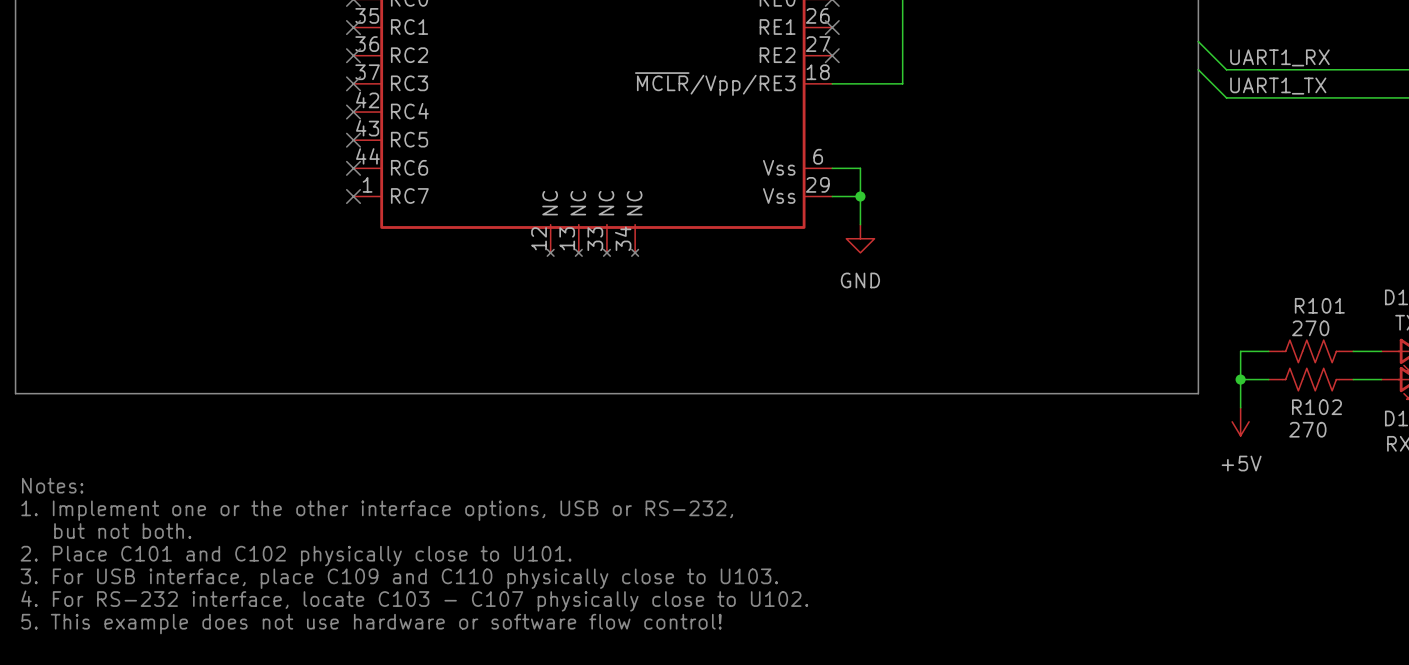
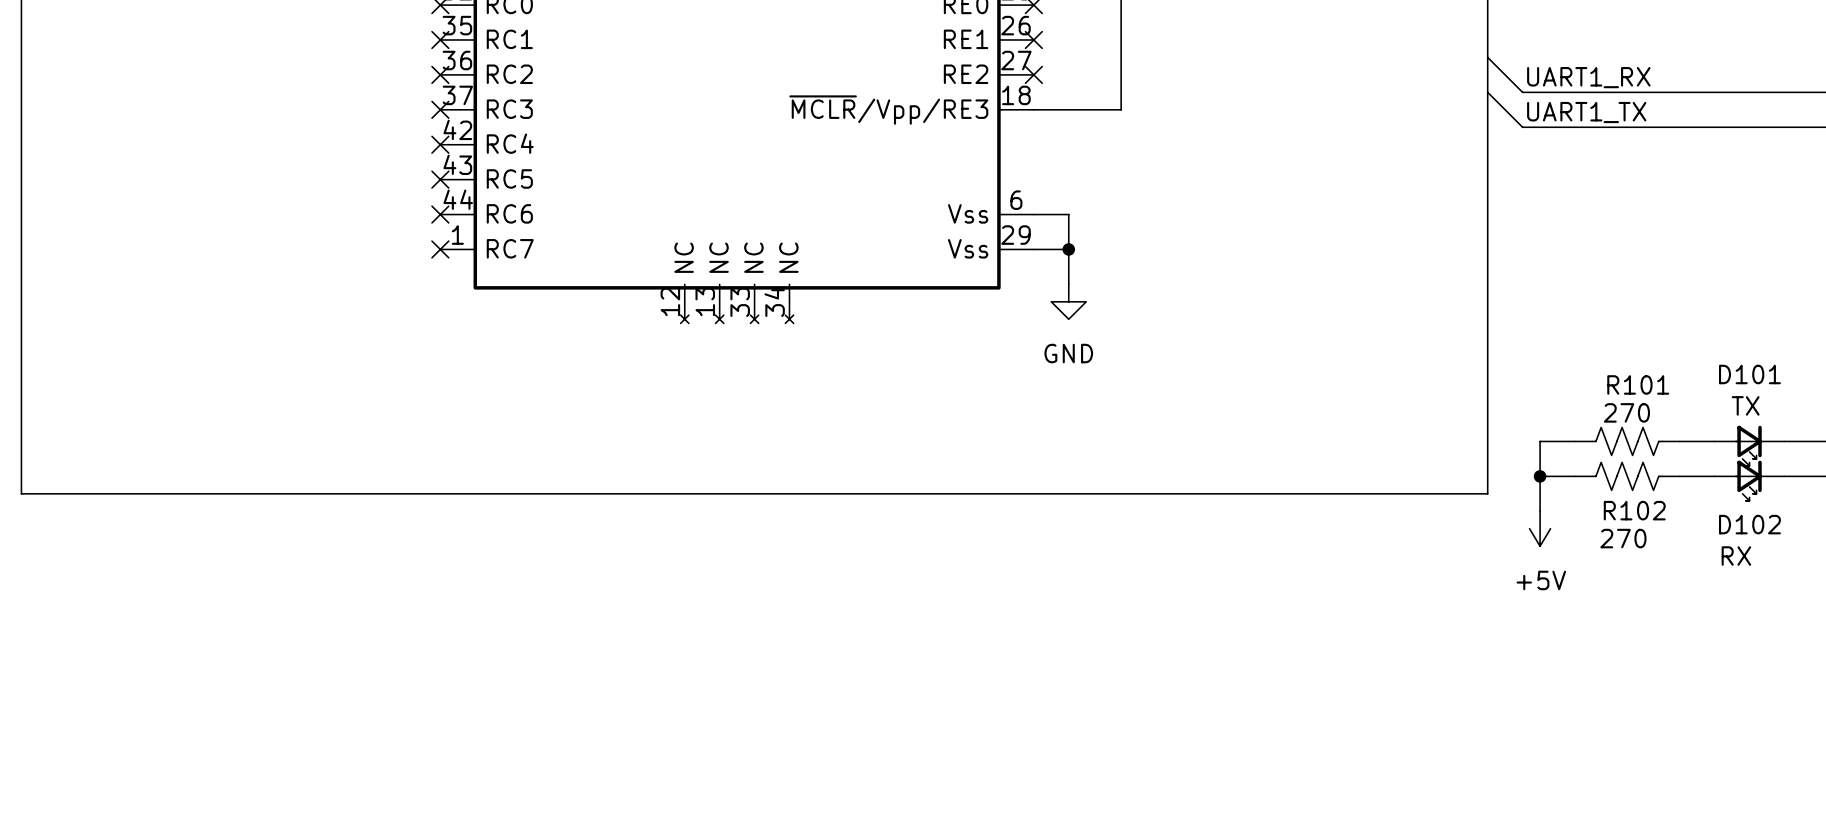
text: Notes: (52, 485) -> none
text: 1. Implement one or the other interface options, USB or RS-232, (377, 510) -> none
text: but not both. (122, 531) -> none
text: 2. Place C101 and C102 physically close to U101. (296, 556) -> none
text: 3. For USB interface, place C109 and C110 physically close to U103. (399, 578) -> none
text: 4. For RS-232 interface, locate C103 - C107 physically close to U102. (414, 601) -> none
text: 5. This example does not use hardware or software flow control! (371, 624) -> none

